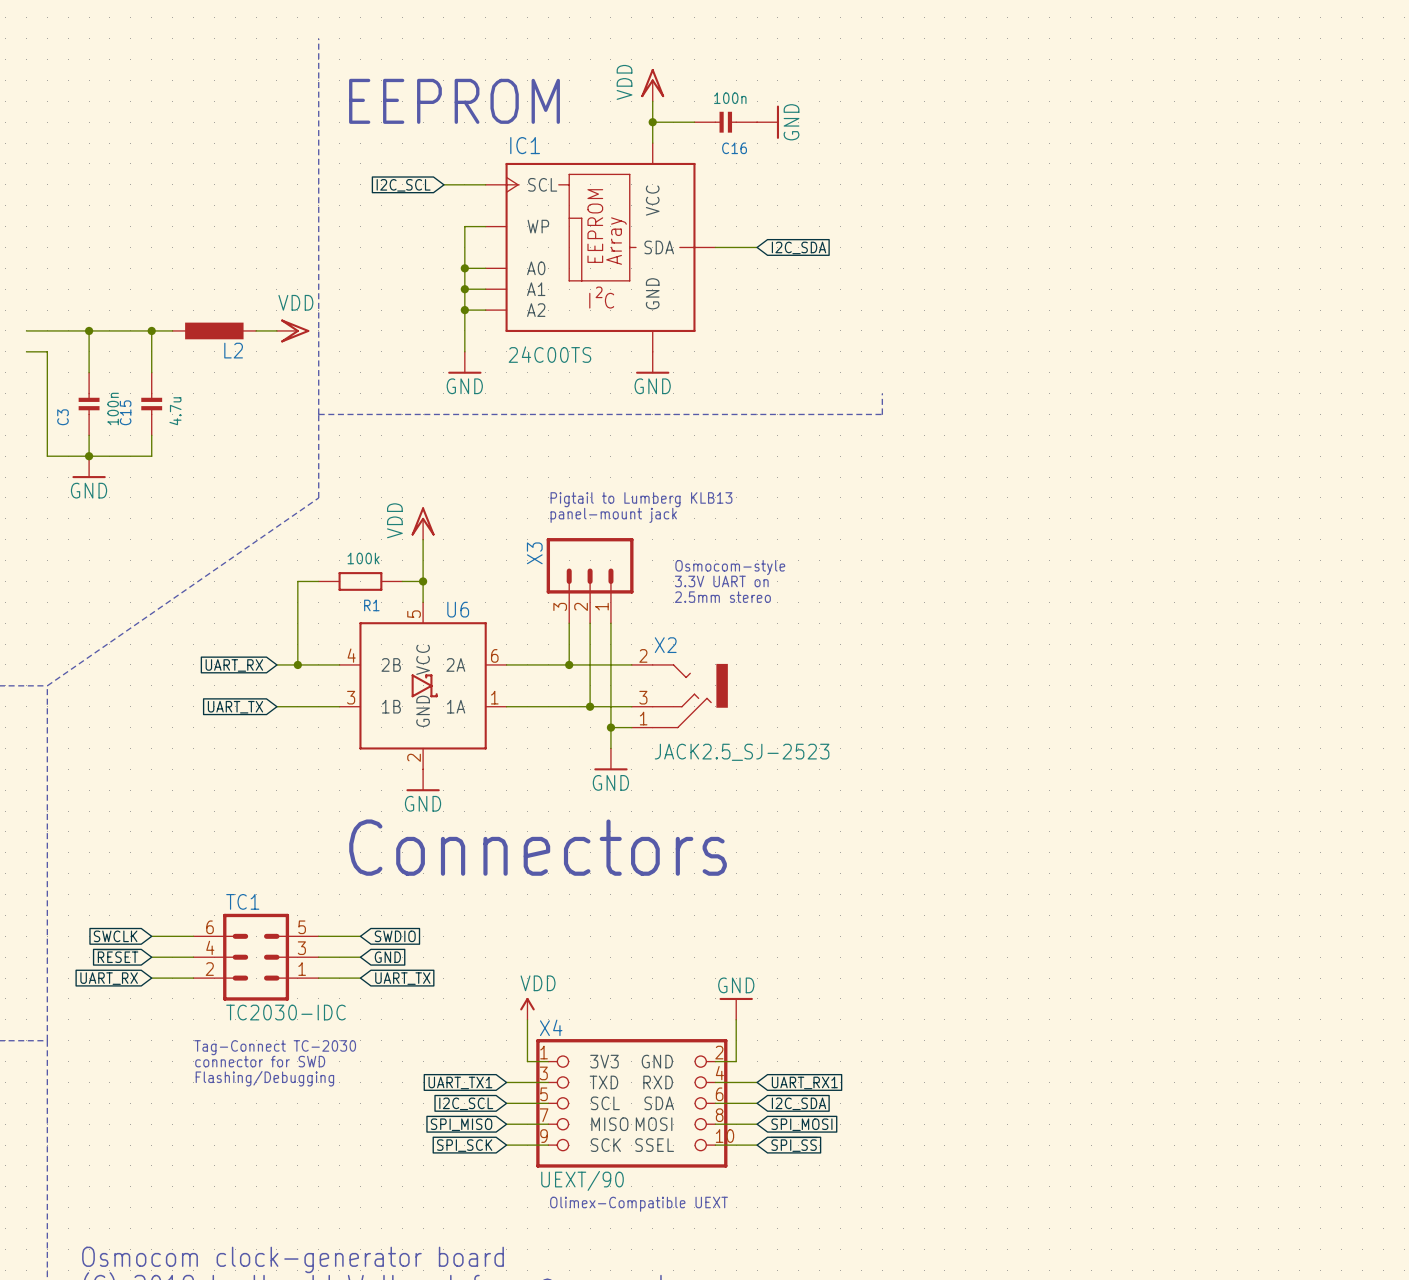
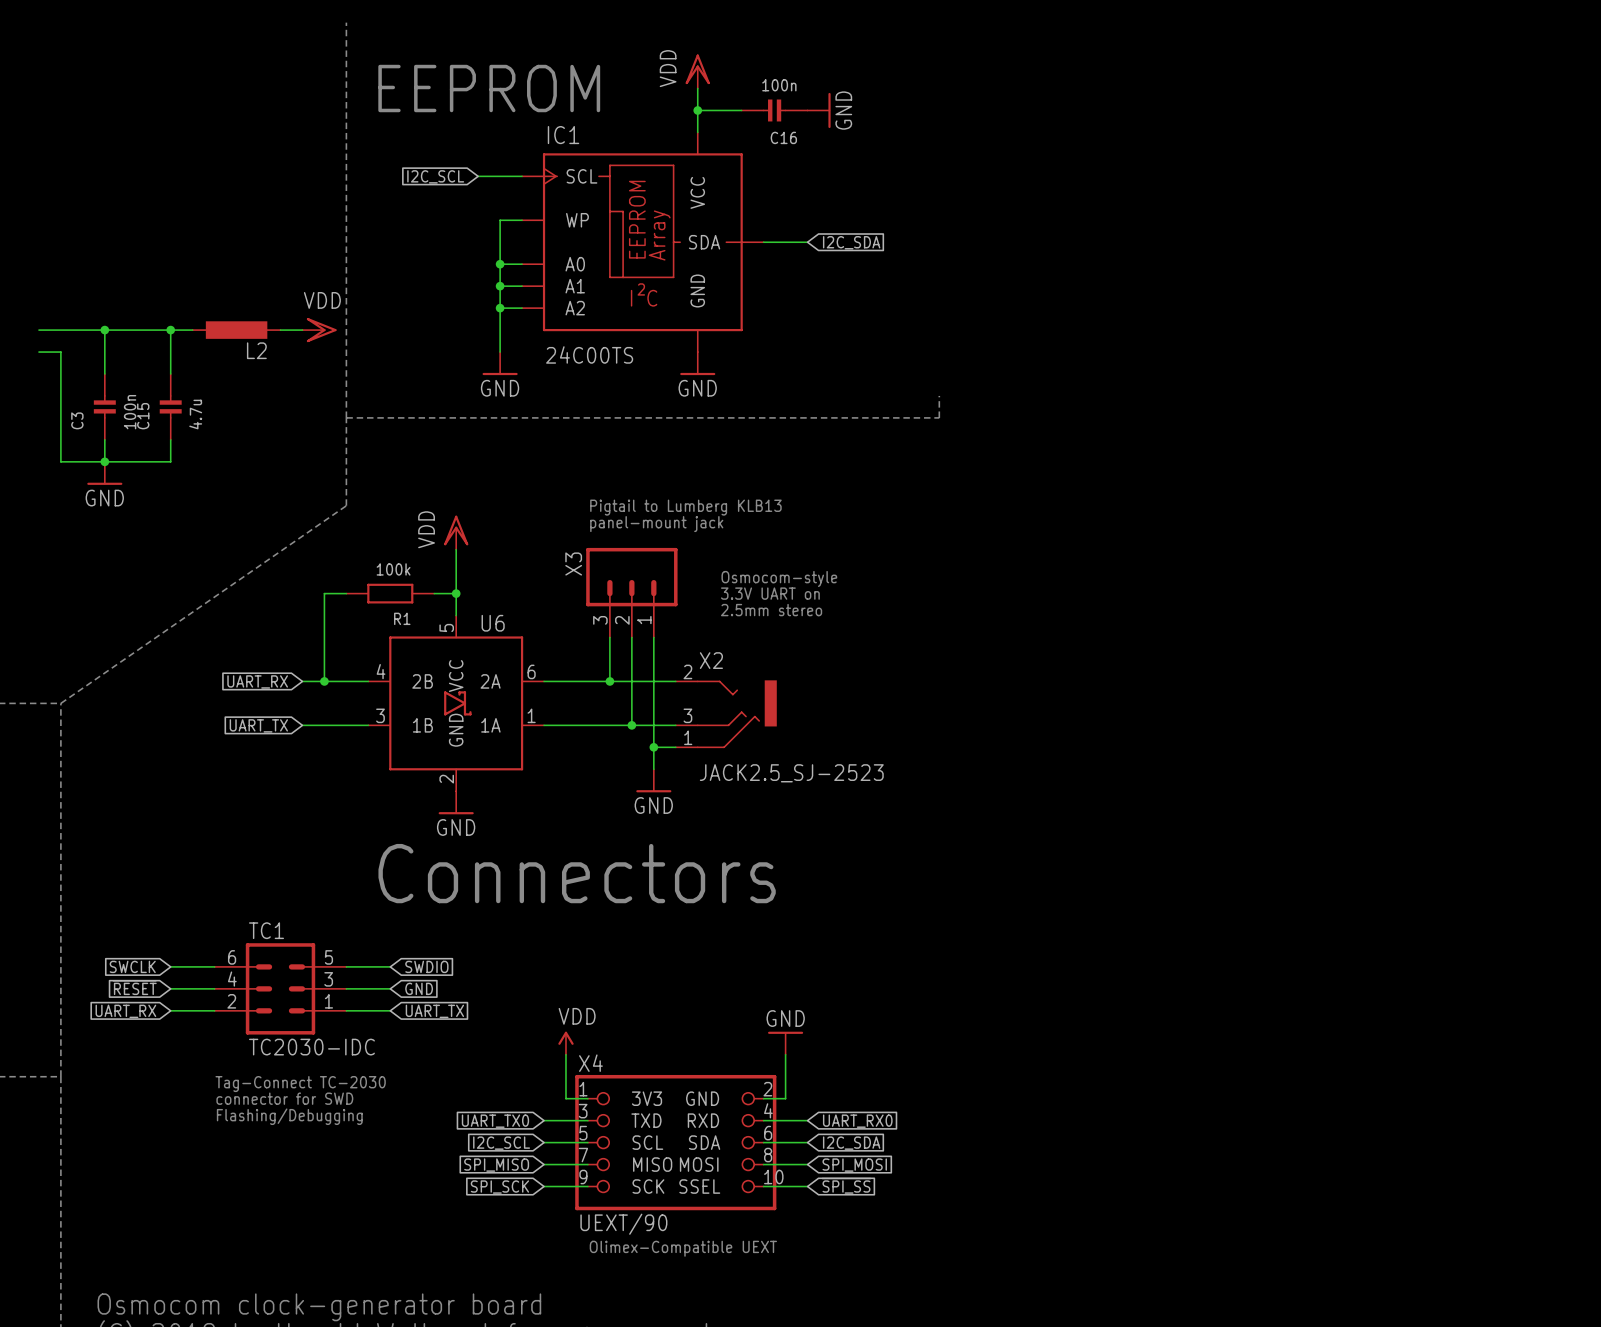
global label: UART_TX1 (460, 1082) -> UART_TX0 (495, 1121)
global label: UART_RX1 (804, 1082) -> UART_RX0 (857, 1121)

